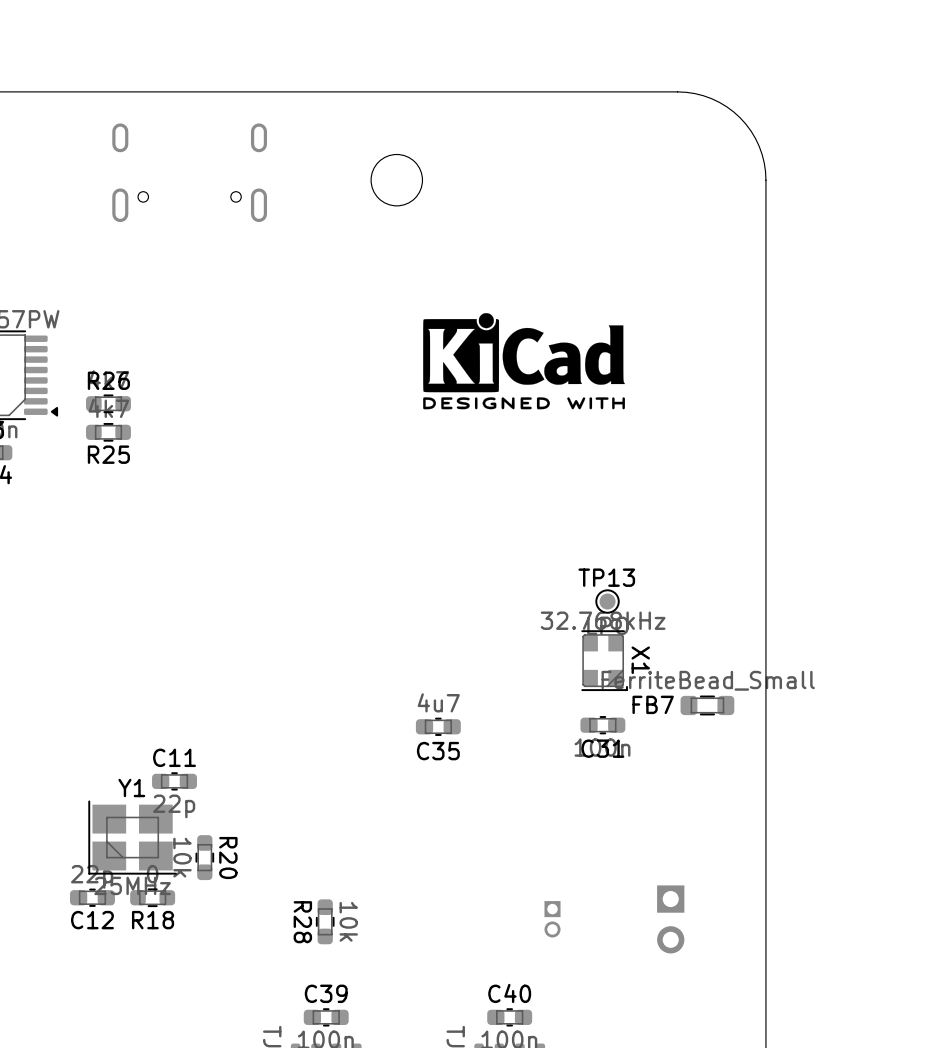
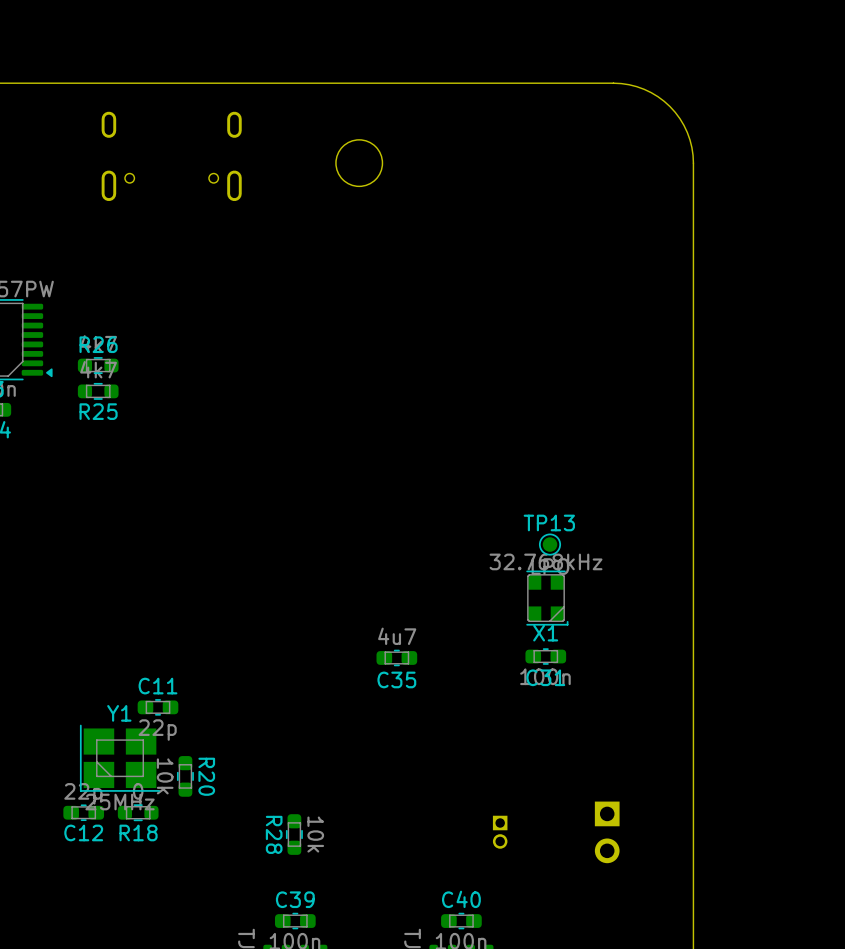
drawing: [423, 313, 625, 410] -> none
X1 name rotation: 0° (640, 660) -> 90° counterclockwise (545, 633)
X1 name position: X1 (640, 660) -> X1 (545, 633)
FB7: FerriteBead_Small (707, 705) -> none

